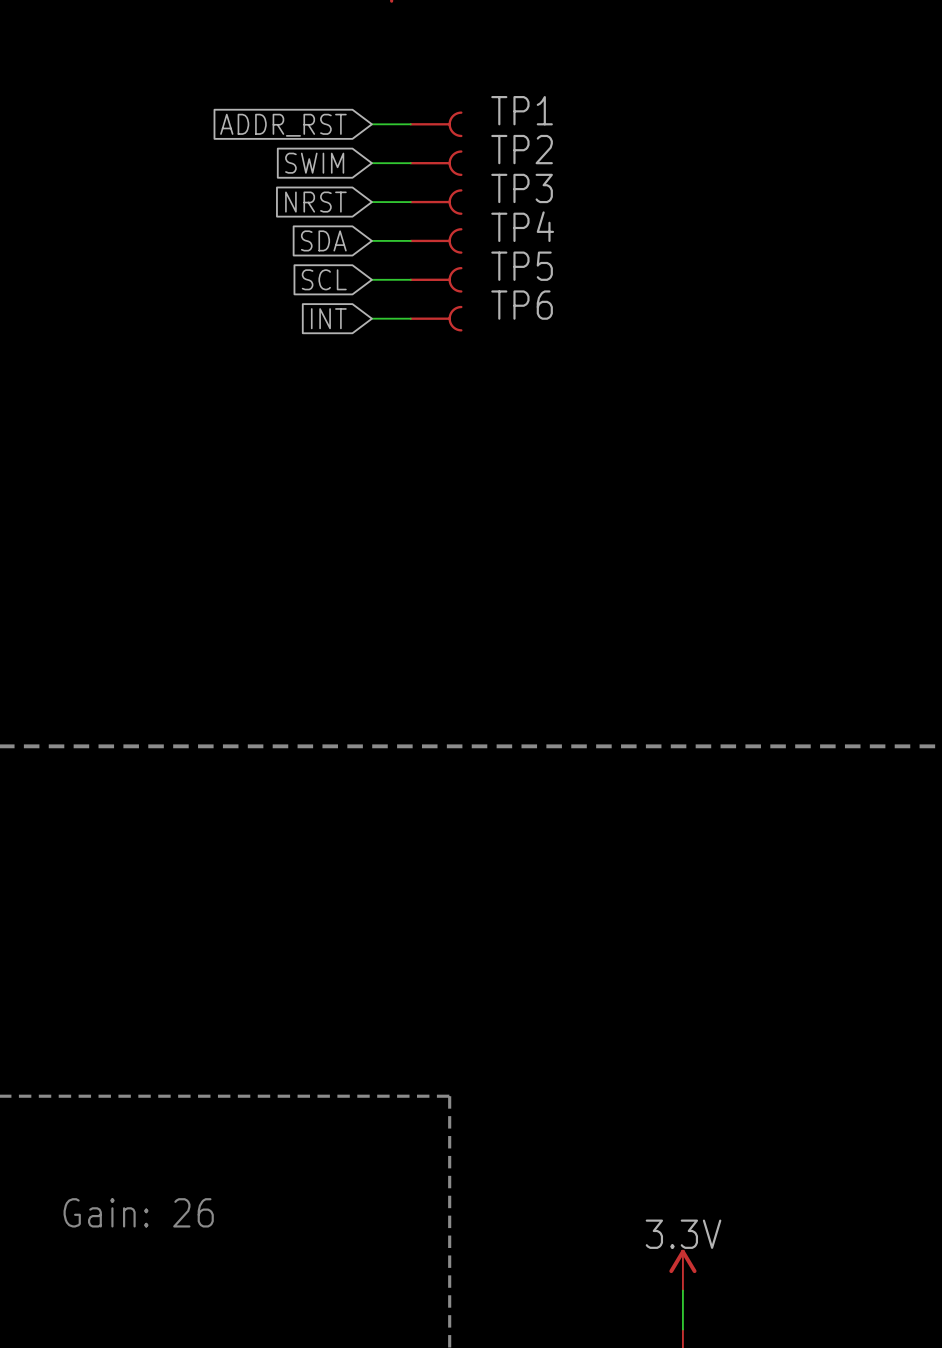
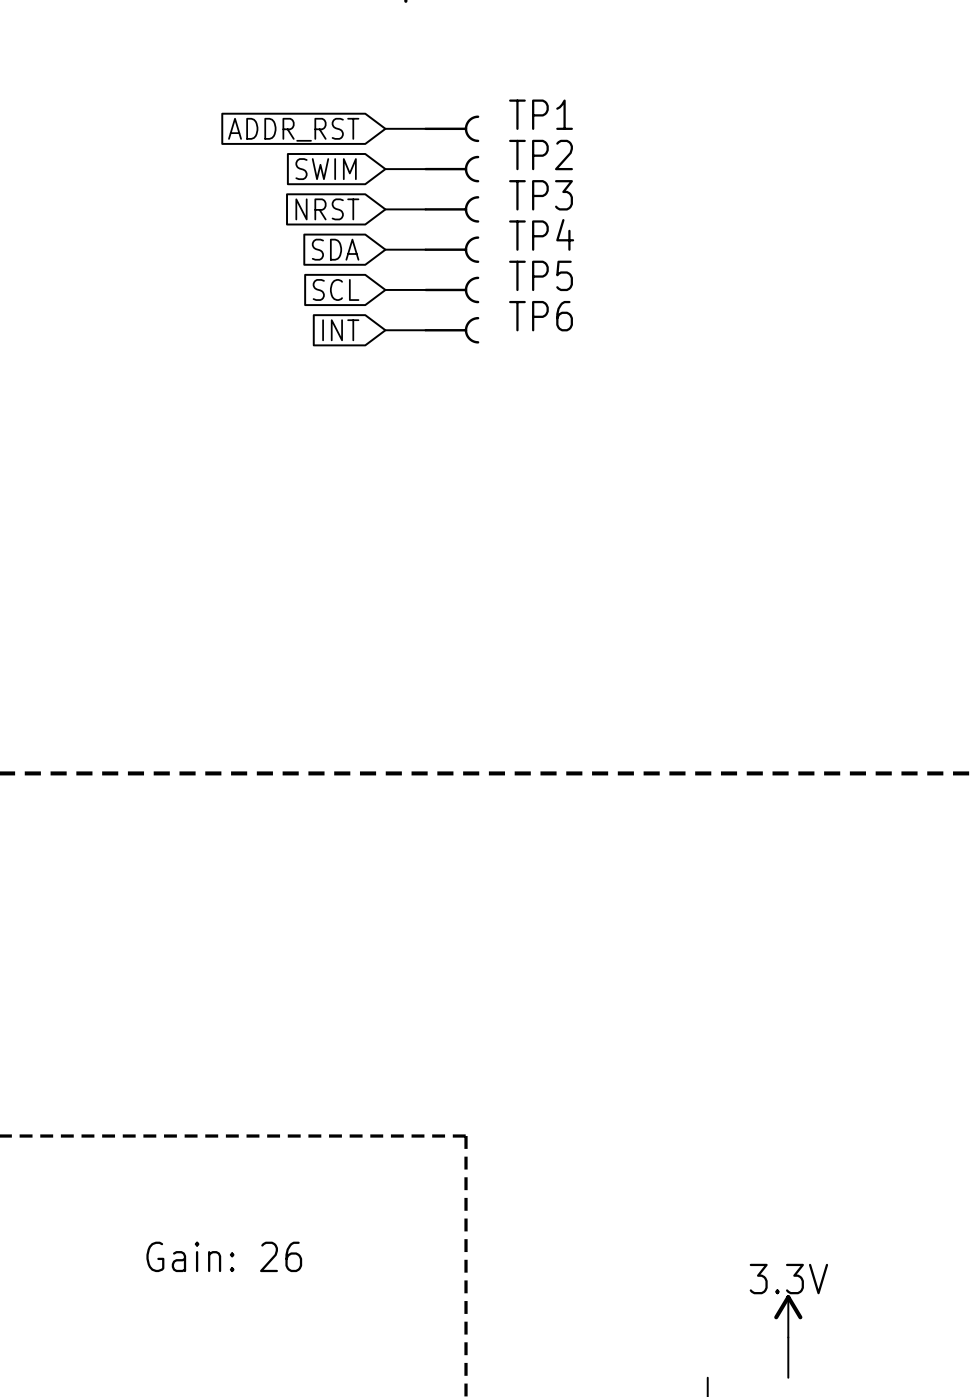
text position: Gain: 26 (138, 1212) -> Gain: 26 (224, 1256)
power symbol position: 3.3V (682, 1270) -> 3.3V (788, 1316)
wire: (682, 1290) (682, 1329) -> (788, 1337) (788, 1377)

